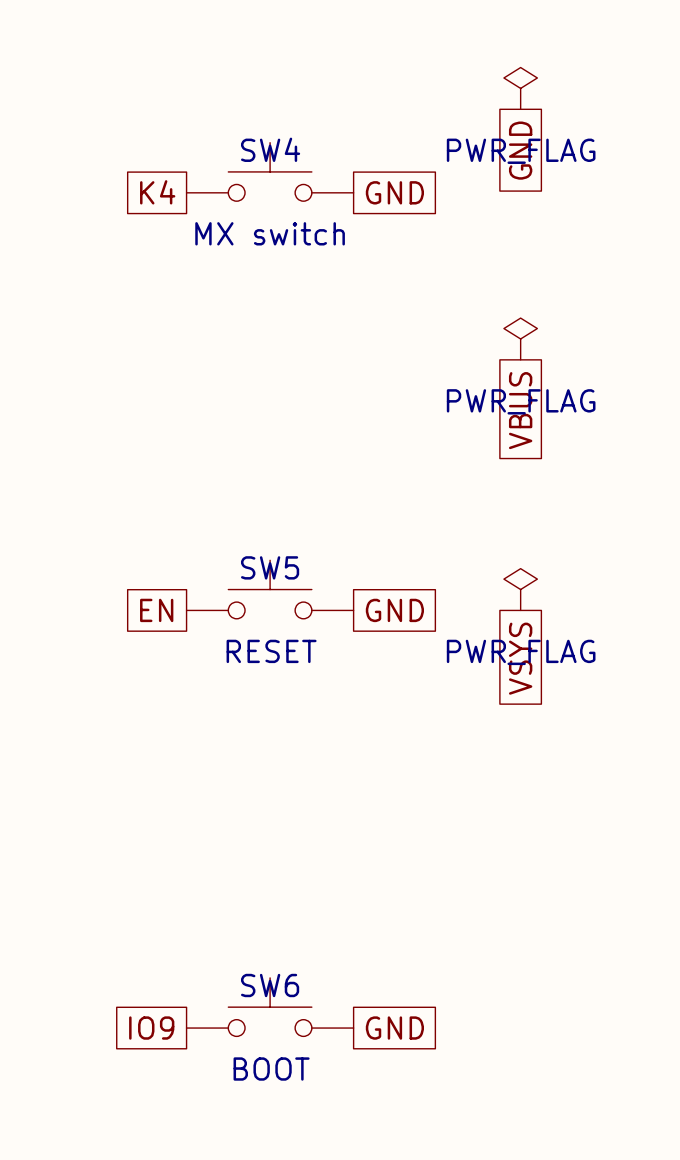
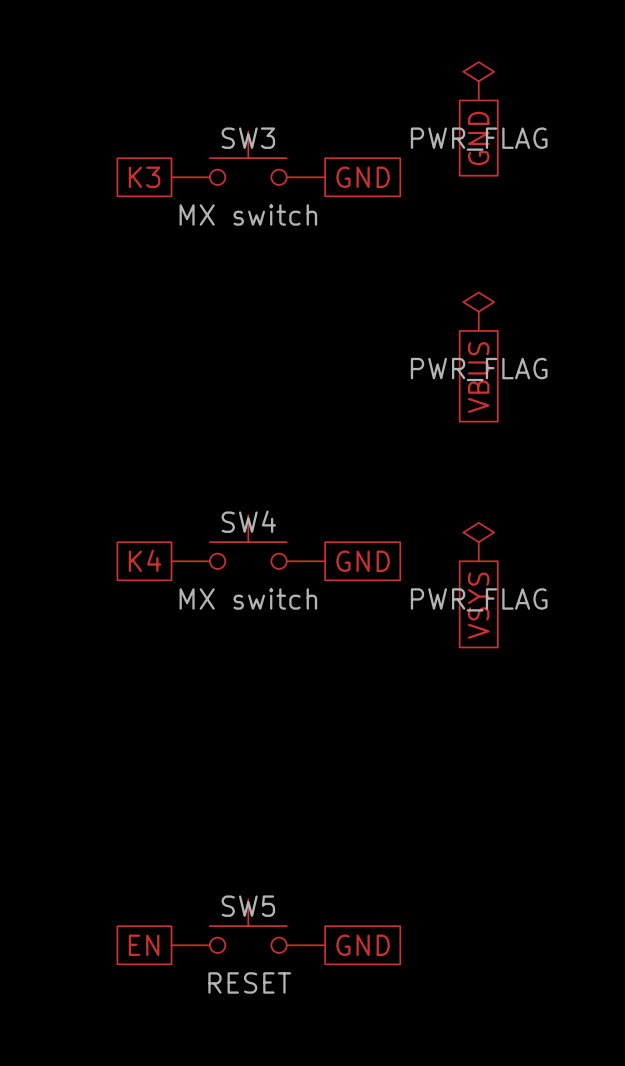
SW4 name: SW4 (270, 149) -> SW3 (248, 138)
global label: K4 (157, 192) -> K3 (144, 177)
SW5 name: SW5 (270, 567) -> SW4 (248, 521)
global label: EN (156, 610) -> K4 (145, 560)
SW5 value: RESET (271, 651) -> MX switch (248, 598)
SW6 name: SW6 (270, 985) -> SW5 (248, 906)
global label: IO9 (151, 1028) -> EN (144, 945)
SW6 value: BOOT (271, 1069) -> RESET (249, 982)

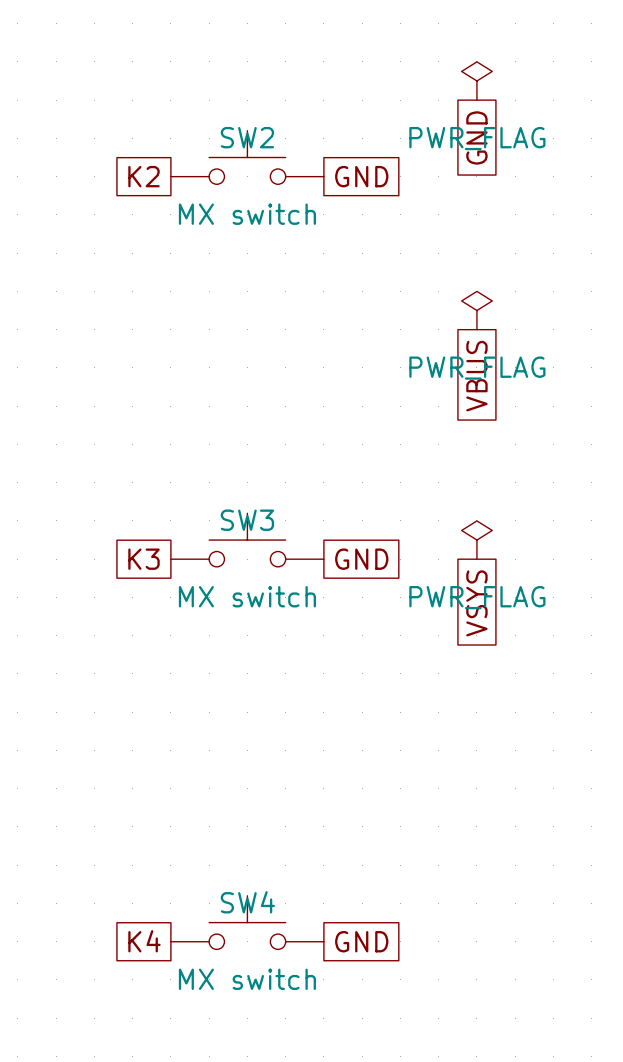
SW3 name: SW3 (248, 138) -> SW2 (247, 137)
global label: K3 (144, 177) -> K2 (144, 176)
SW4 name: SW4 (248, 521) -> SW3 (247, 520)
global label: K4 (145, 560) -> K3 (144, 559)
SW5 name: SW5 (248, 906) -> SW4 (247, 902)
global label: EN (144, 945) -> K4 (144, 941)
SW5 value: RESET (249, 982) -> MX switch (247, 979)

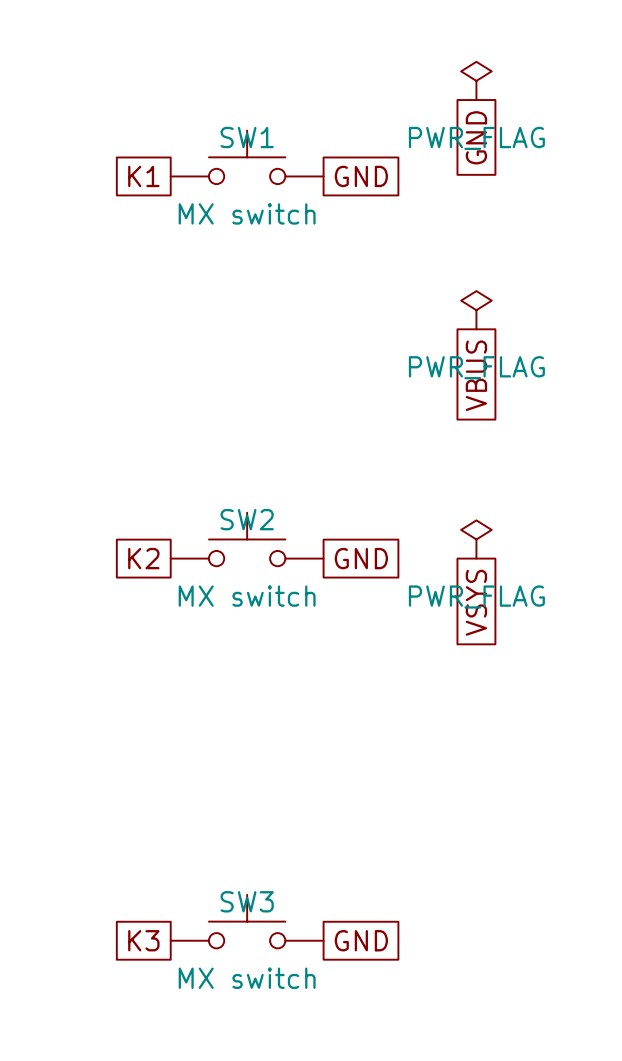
SW2 name: SW2 (247, 137) -> SW1 (247, 137)
global label: K2 (144, 176) -> K1 (143, 176)
SW3 name: SW3 (247, 520) -> SW2 (247, 519)
global label: K3 (144, 559) -> K2 (143, 558)
SW4 name: SW4 (247, 902) -> SW3 (247, 901)
global label: K4 (144, 941) -> K3 (143, 940)

